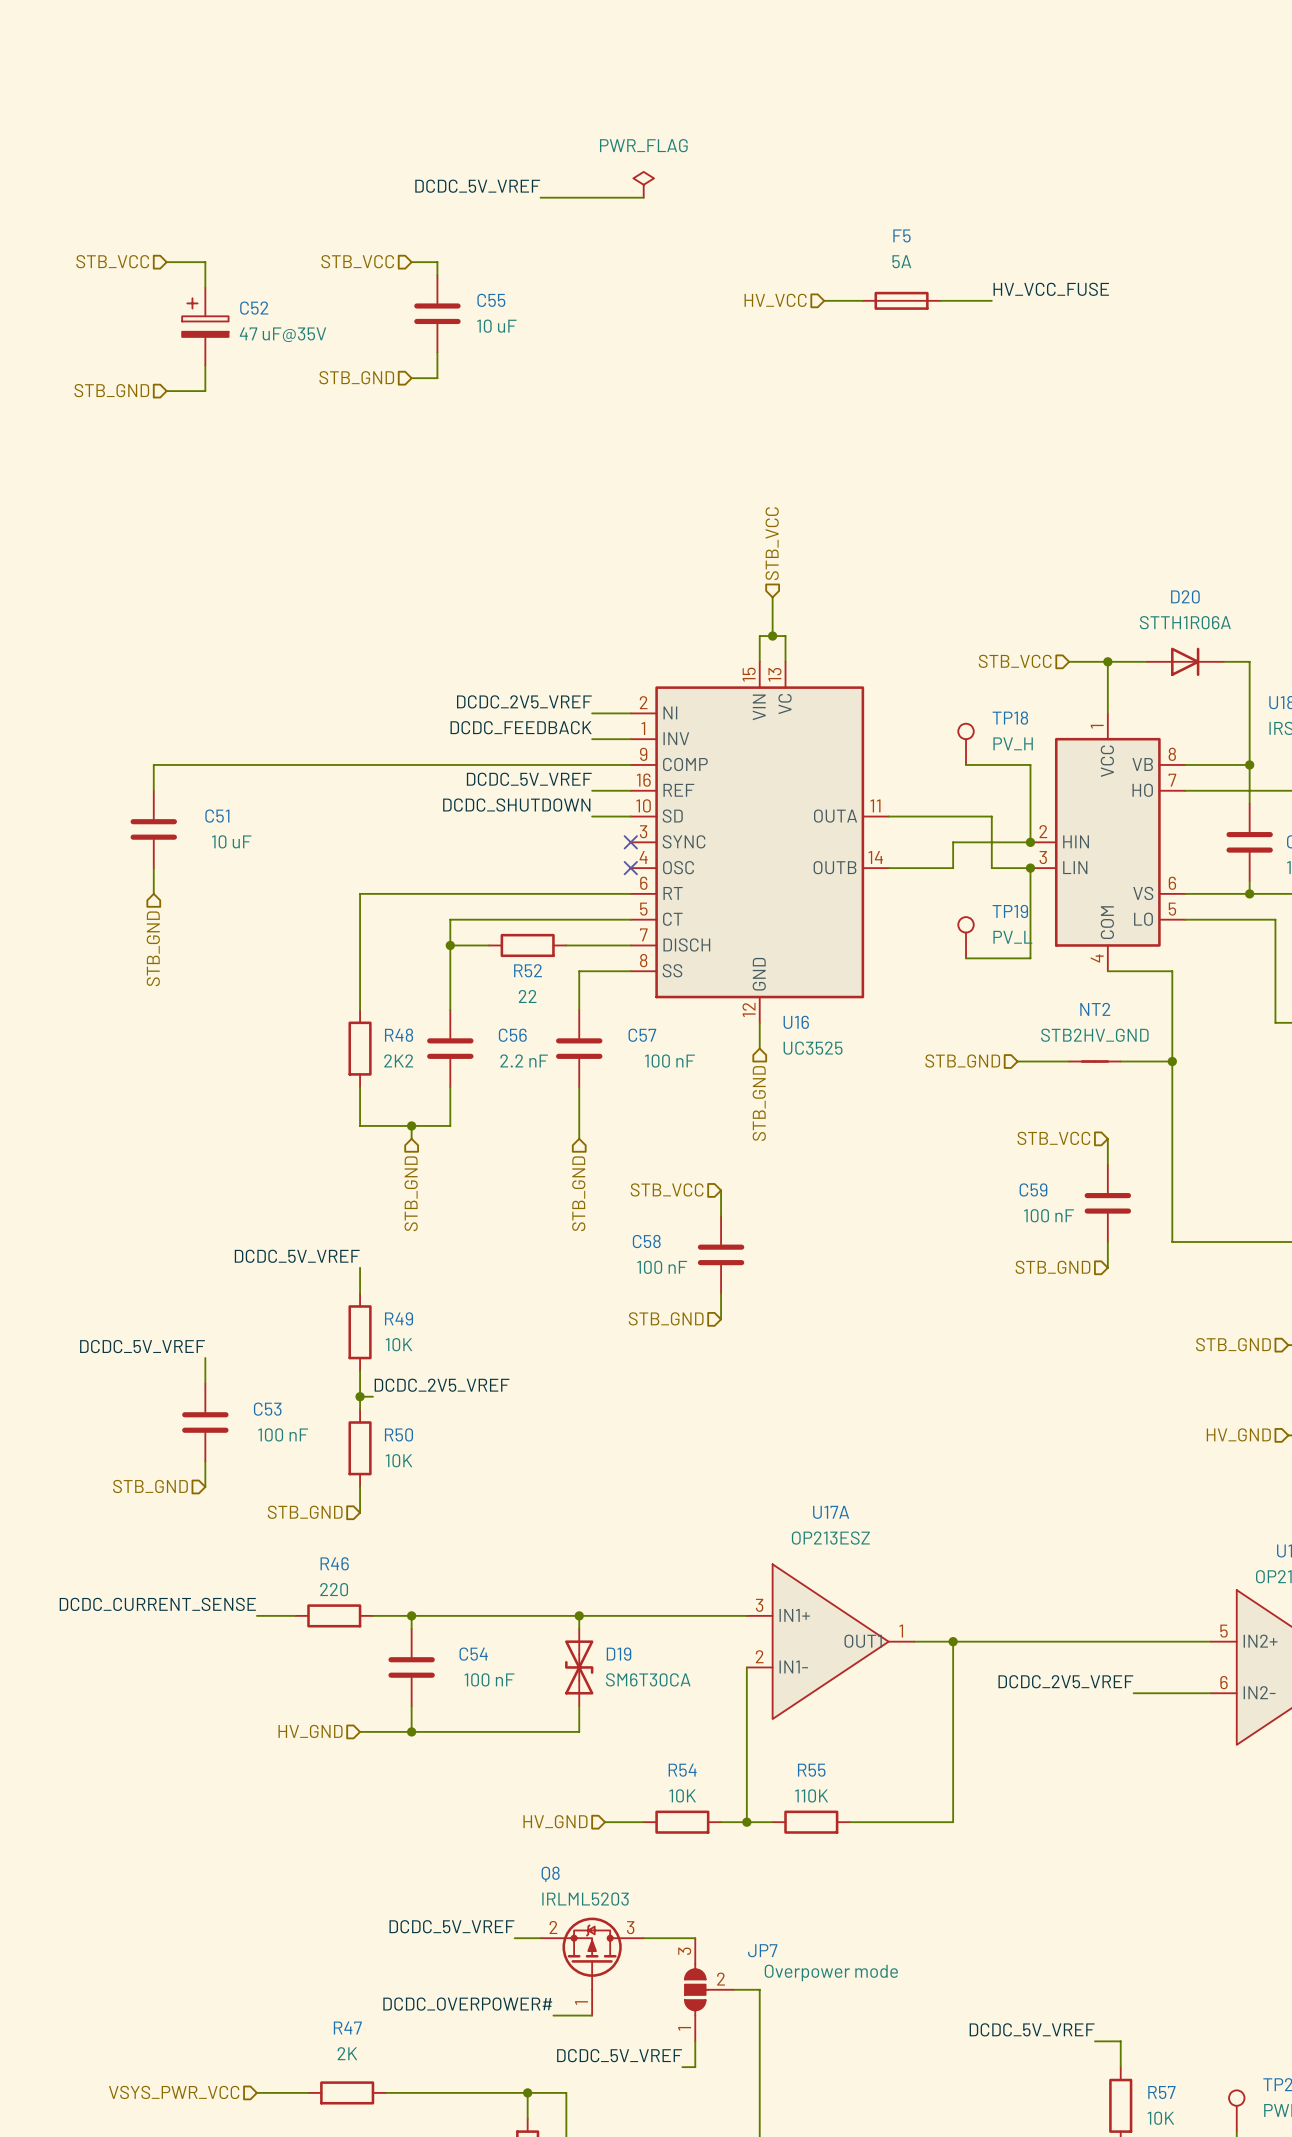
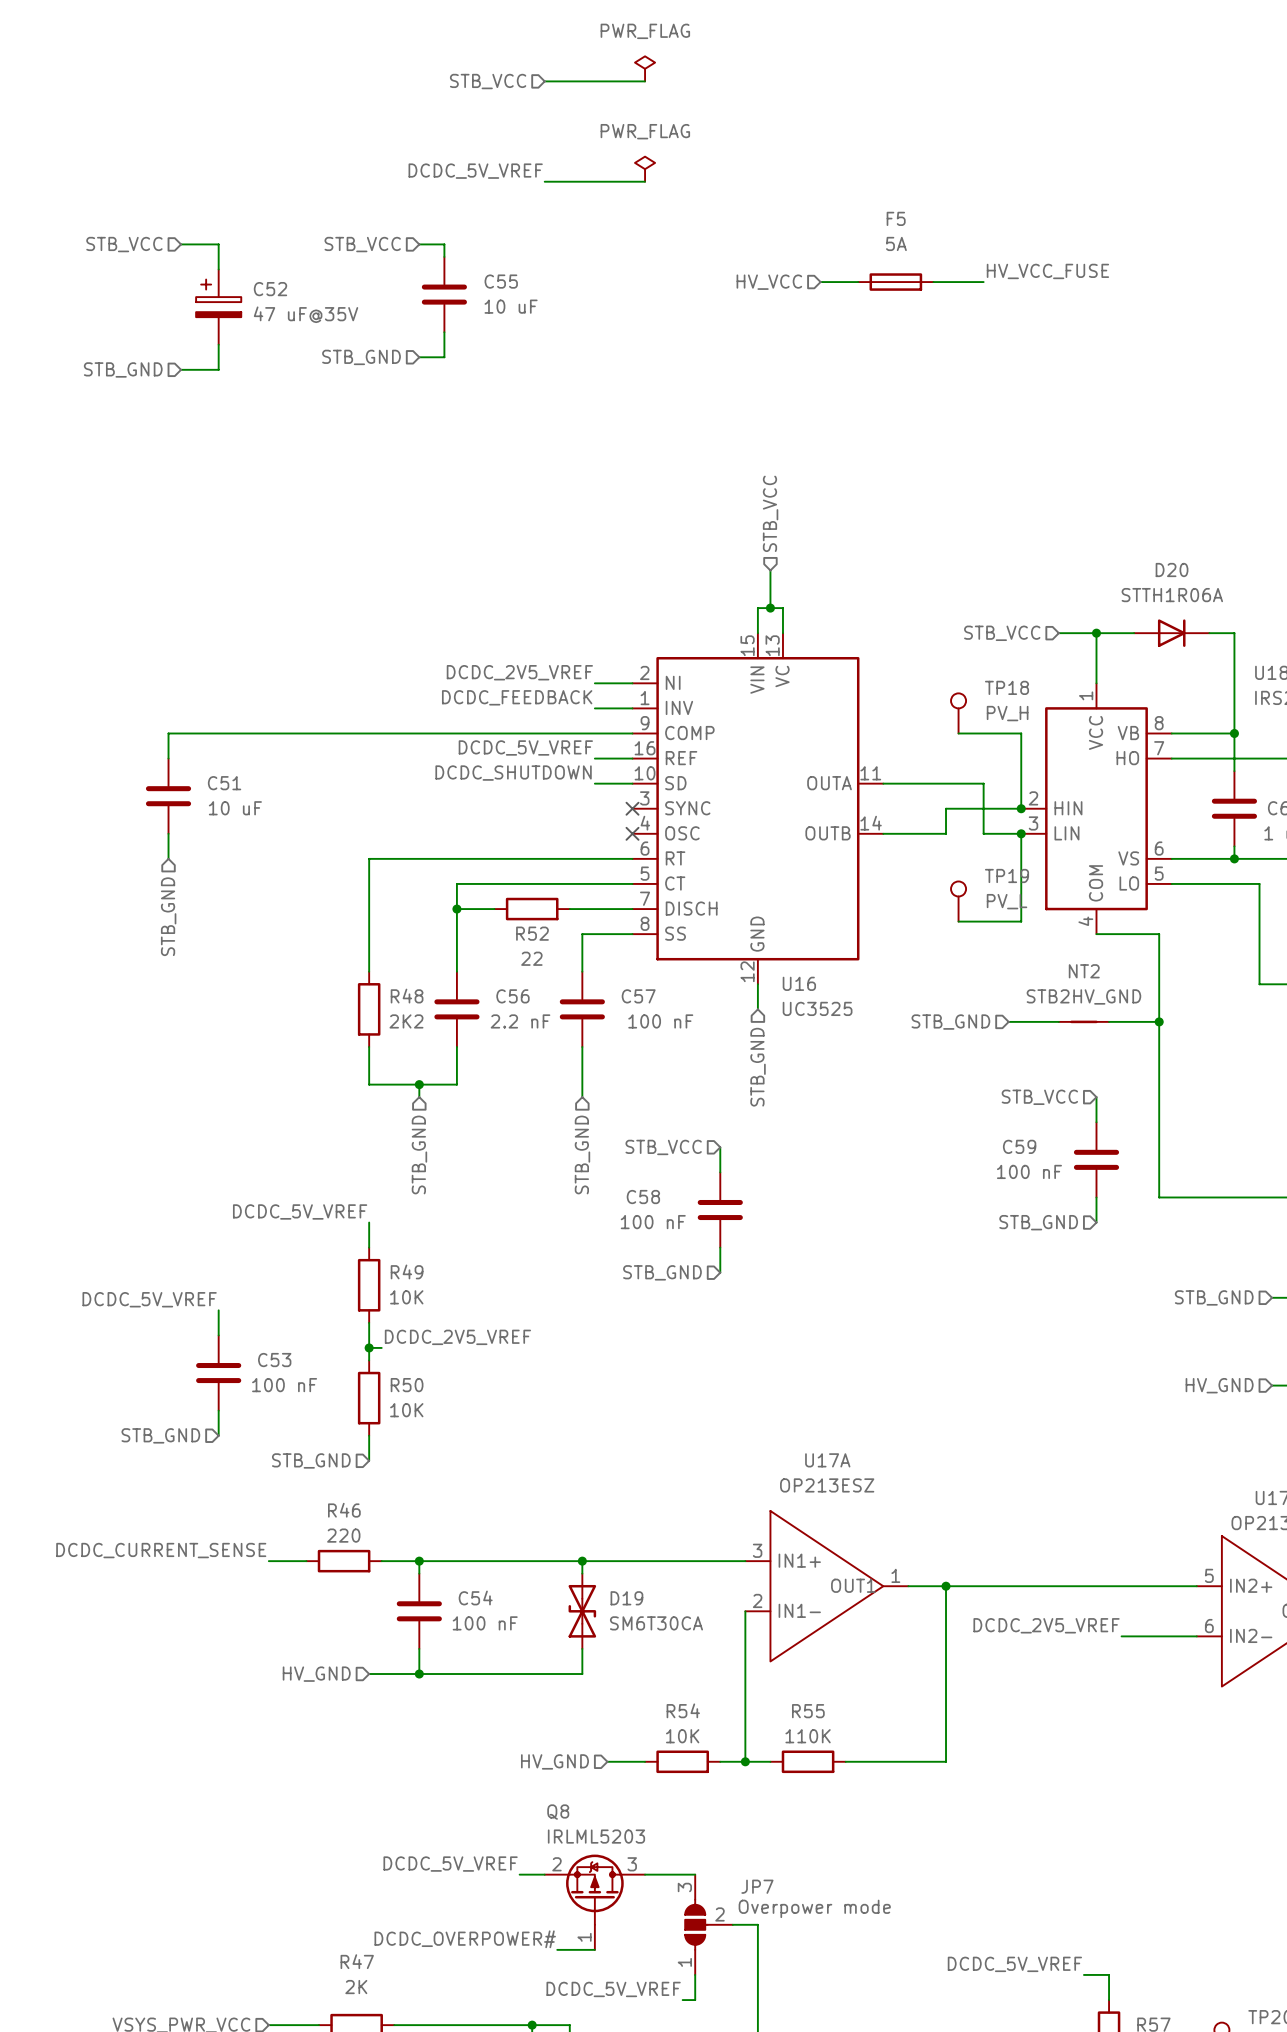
power symbol: none -> PWR_FLAG (645, 68)
hierarchical label: none -> STB_VCC (488, 81)
wire: none -> (544, 81) (645, 81)

